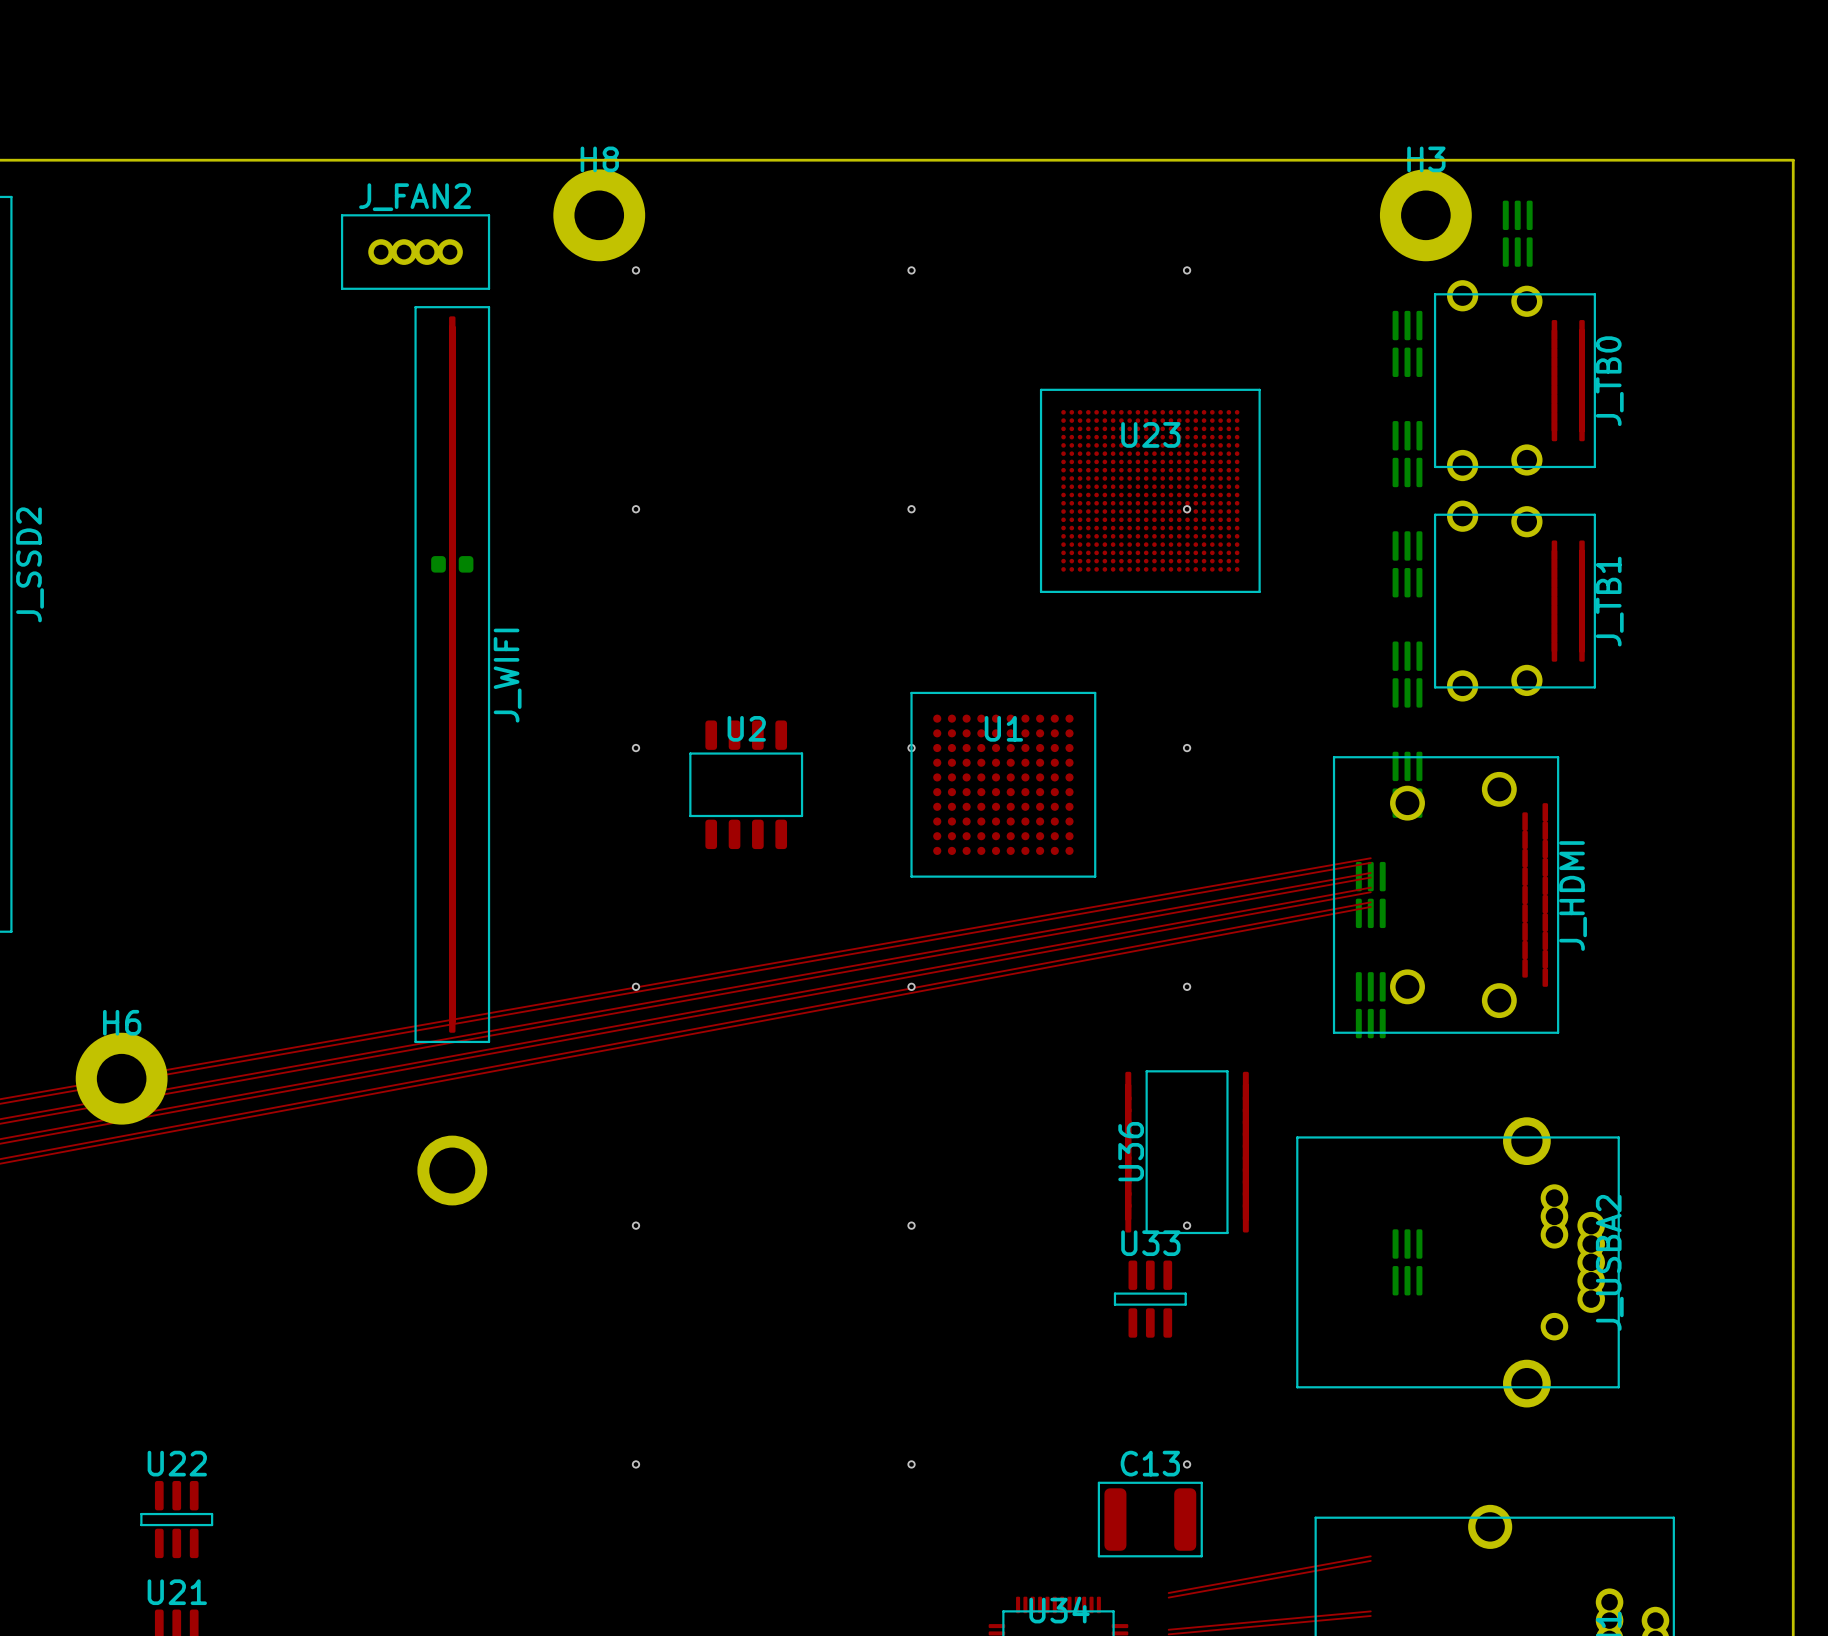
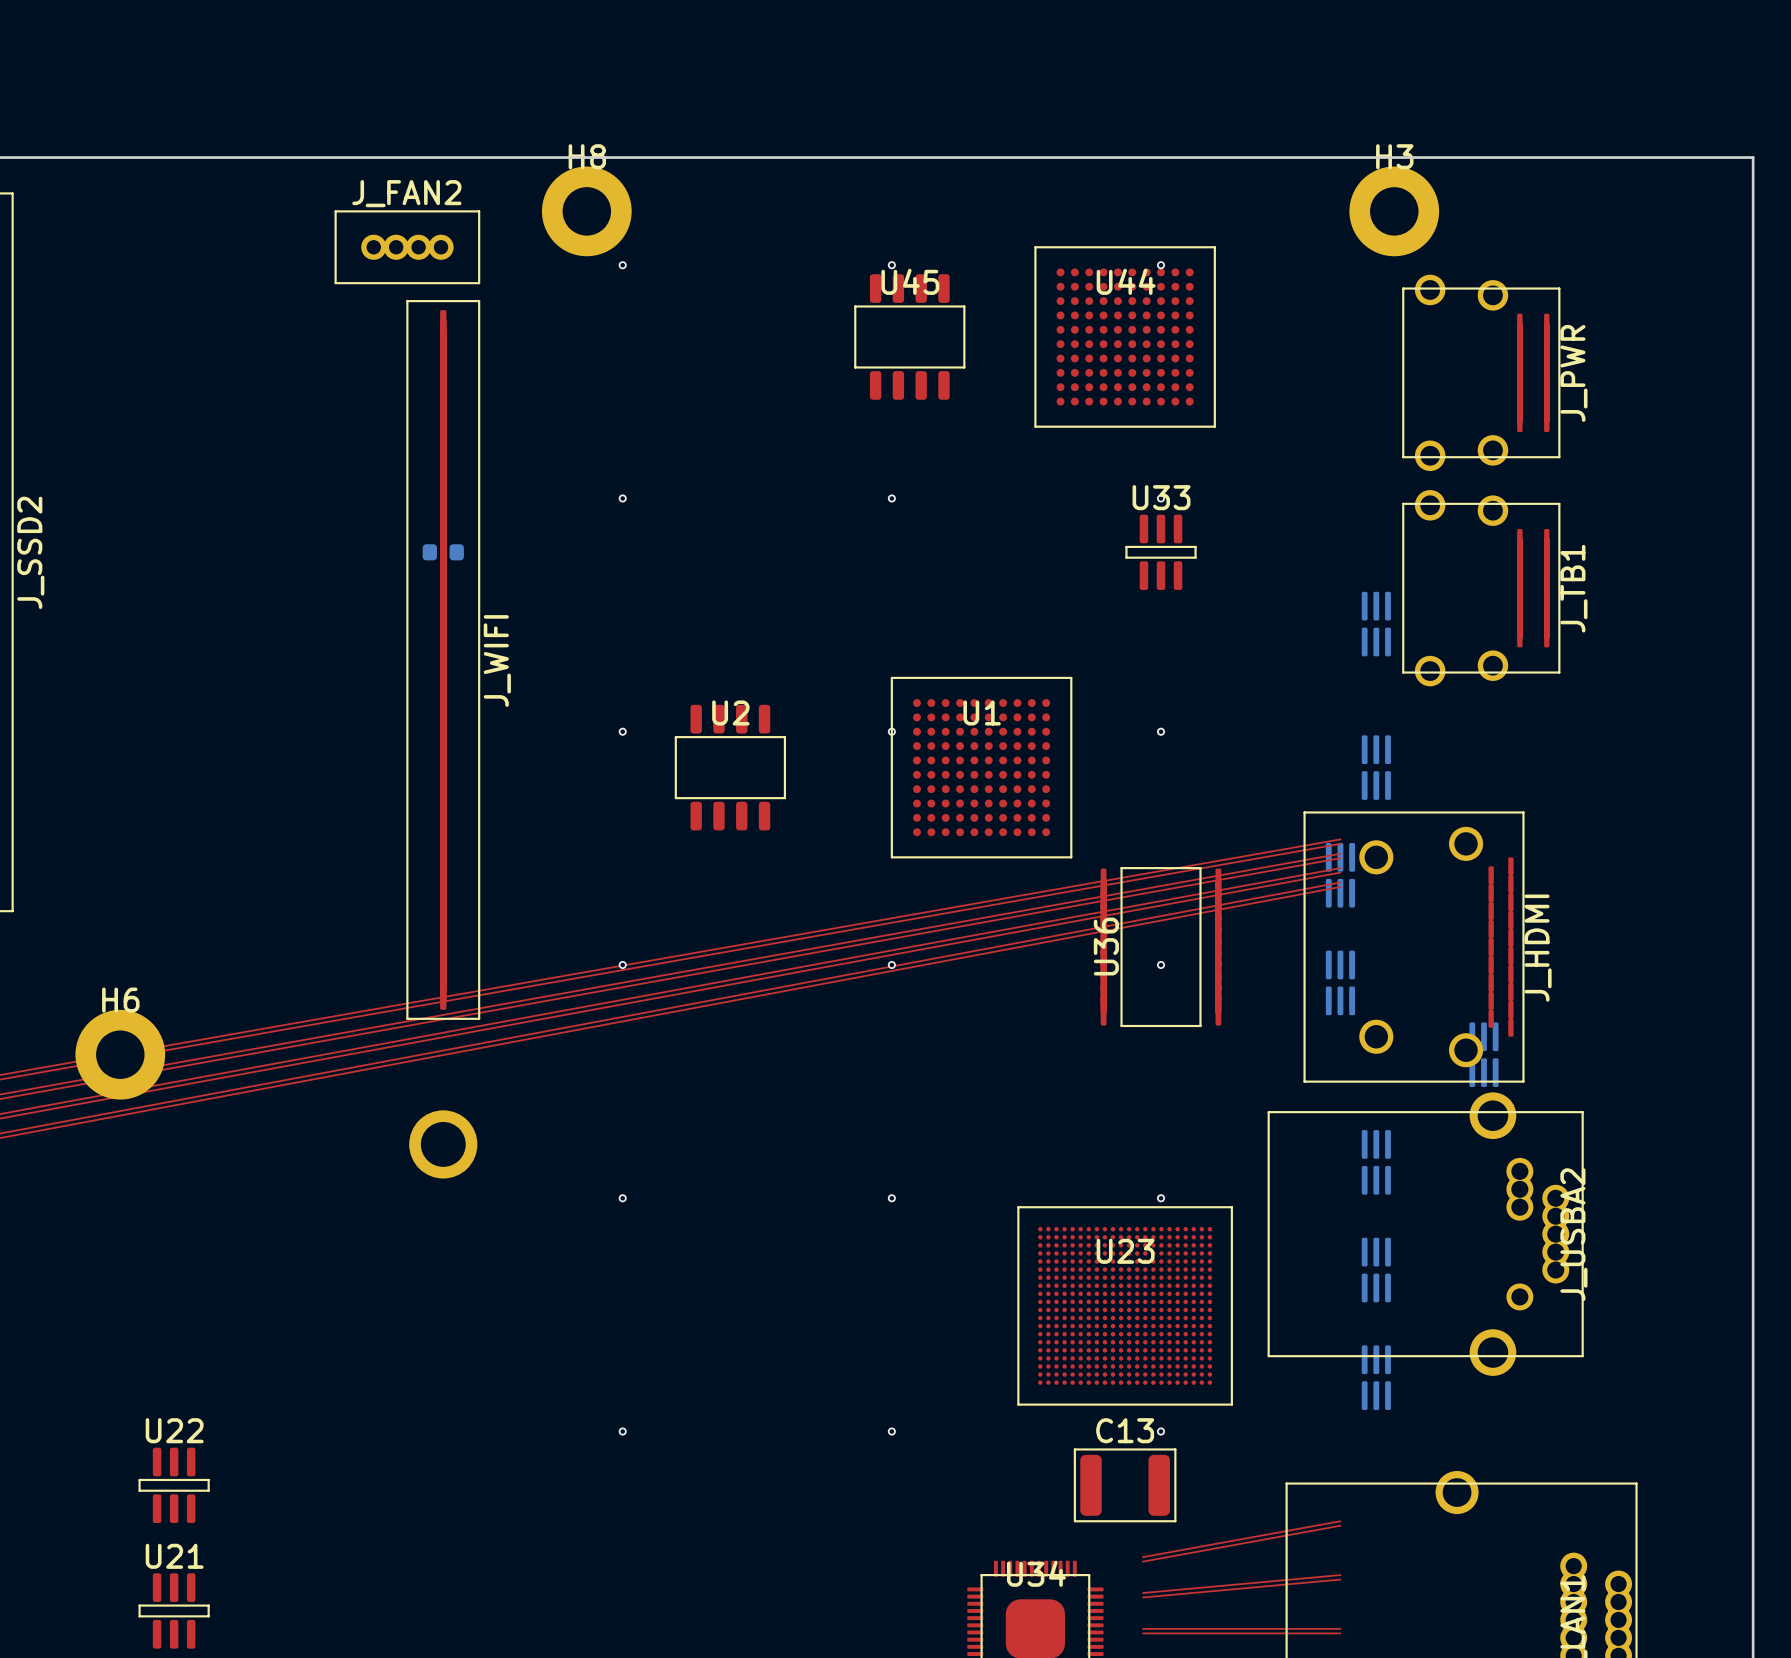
part: (1517, 233) -> none
U45: none -> (909, 336)
U44: none -> (1125, 336)
part: (1407, 343) -> none
J_TB0 name: J_TB0 (1609, 381) -> J_PWR (1573, 373)
part: (1407, 454) -> none
U23 position: (1150, 490) -> (1125, 1305)
part: (1407, 564) -> none
part: none -> (1376, 624)
part: (1407, 674) -> none
J_HDMI position: (1446, 894) -> (1414, 947)
part: none -> (1483, 1054)
U36 position: (1187, 1152) -> (1161, 947)
part: none -> (1376, 1162)
part: (1407, 1262) -> none
U33 position: (1150, 1299) -> (1161, 552)
part: none -> (1376, 1270)
part: none -> (1376, 1377)

